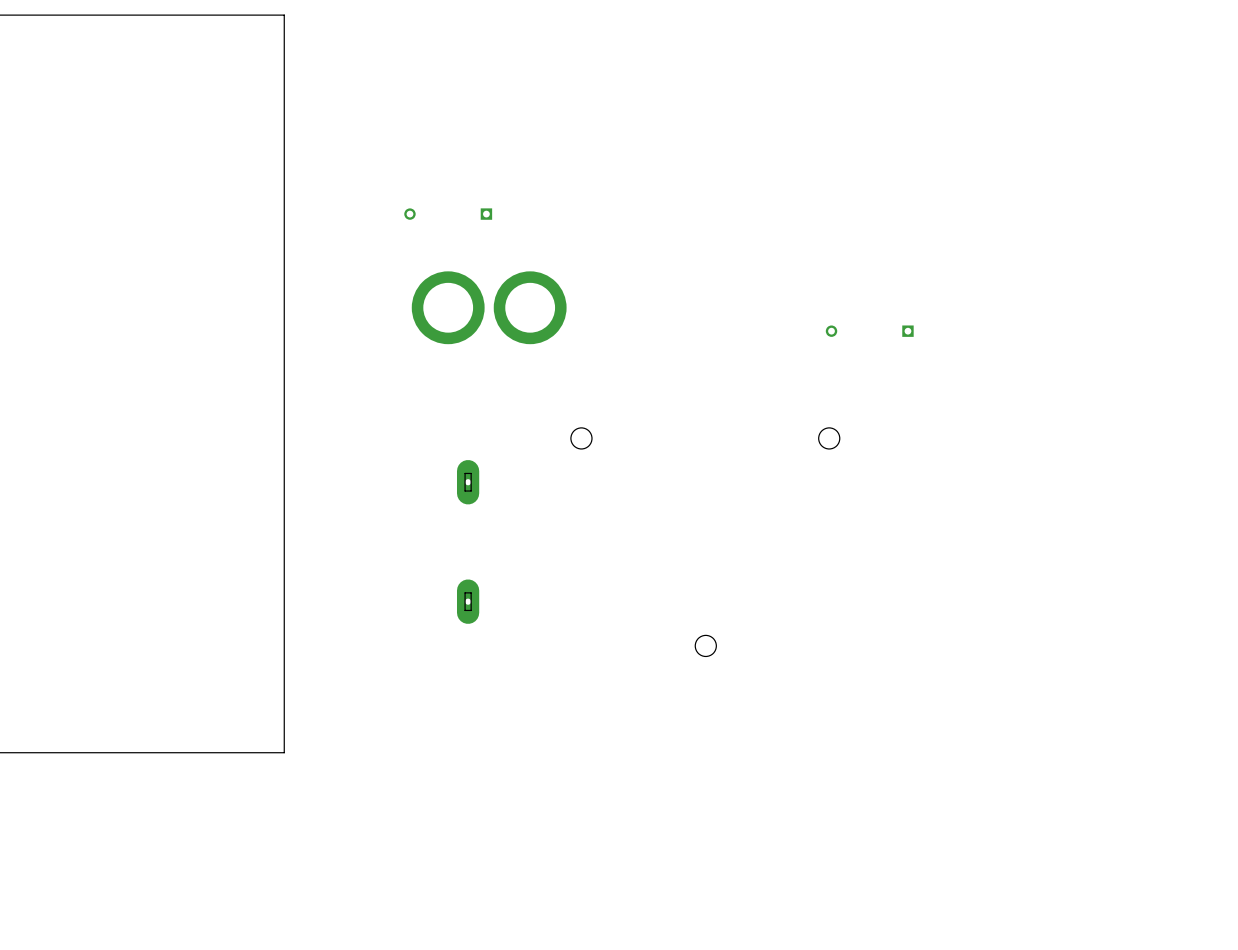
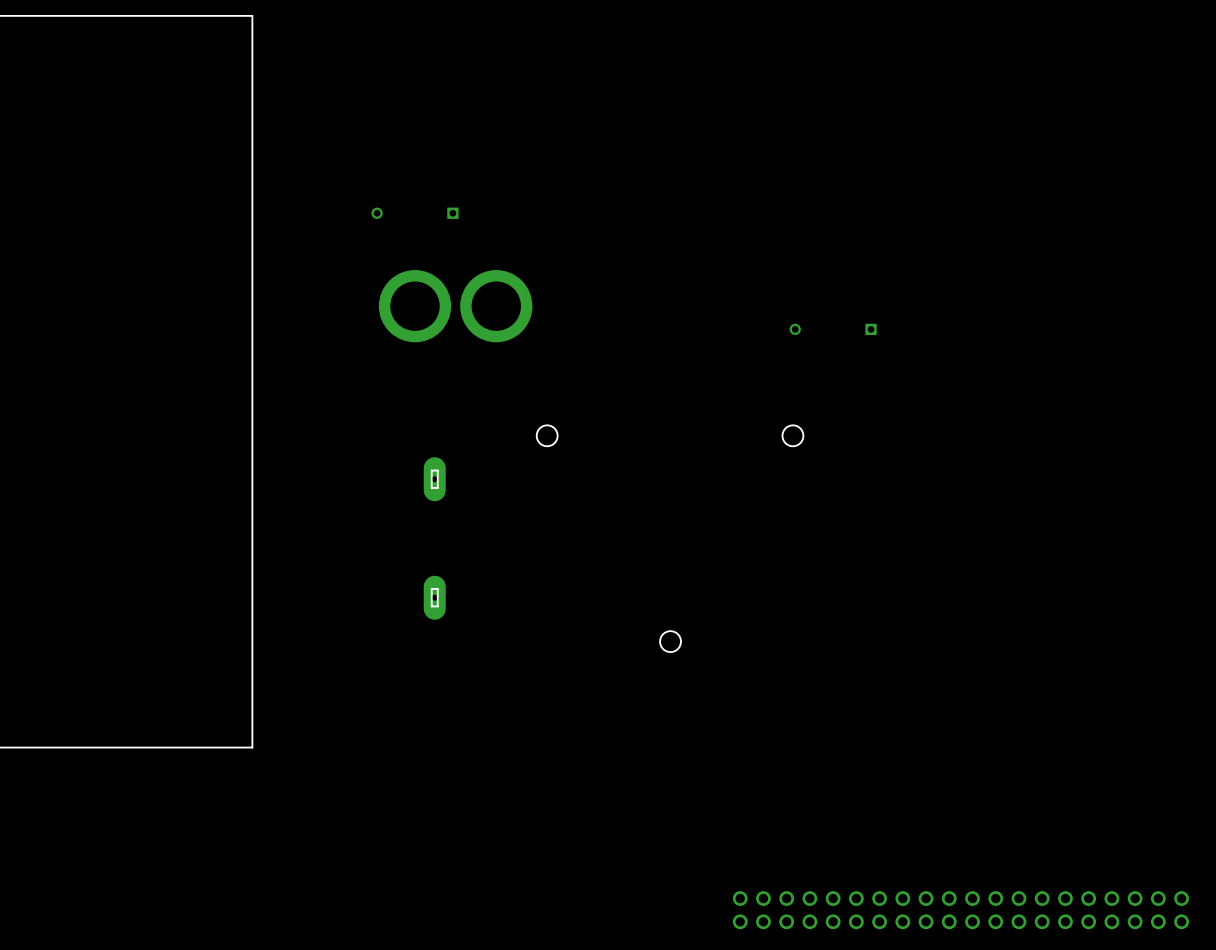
part: none -> (960, 910)

